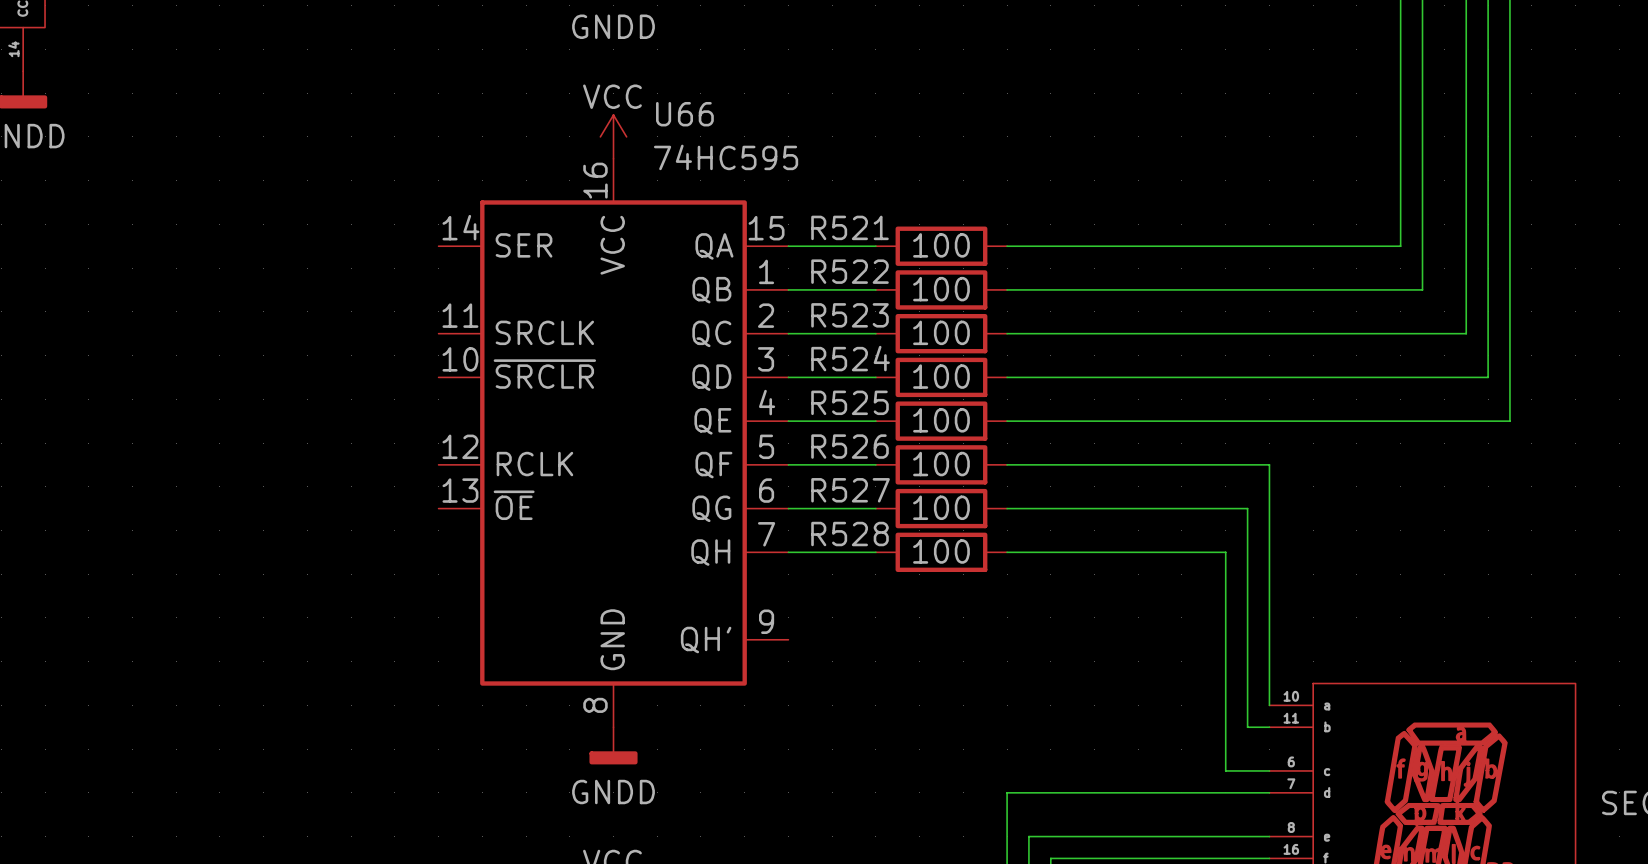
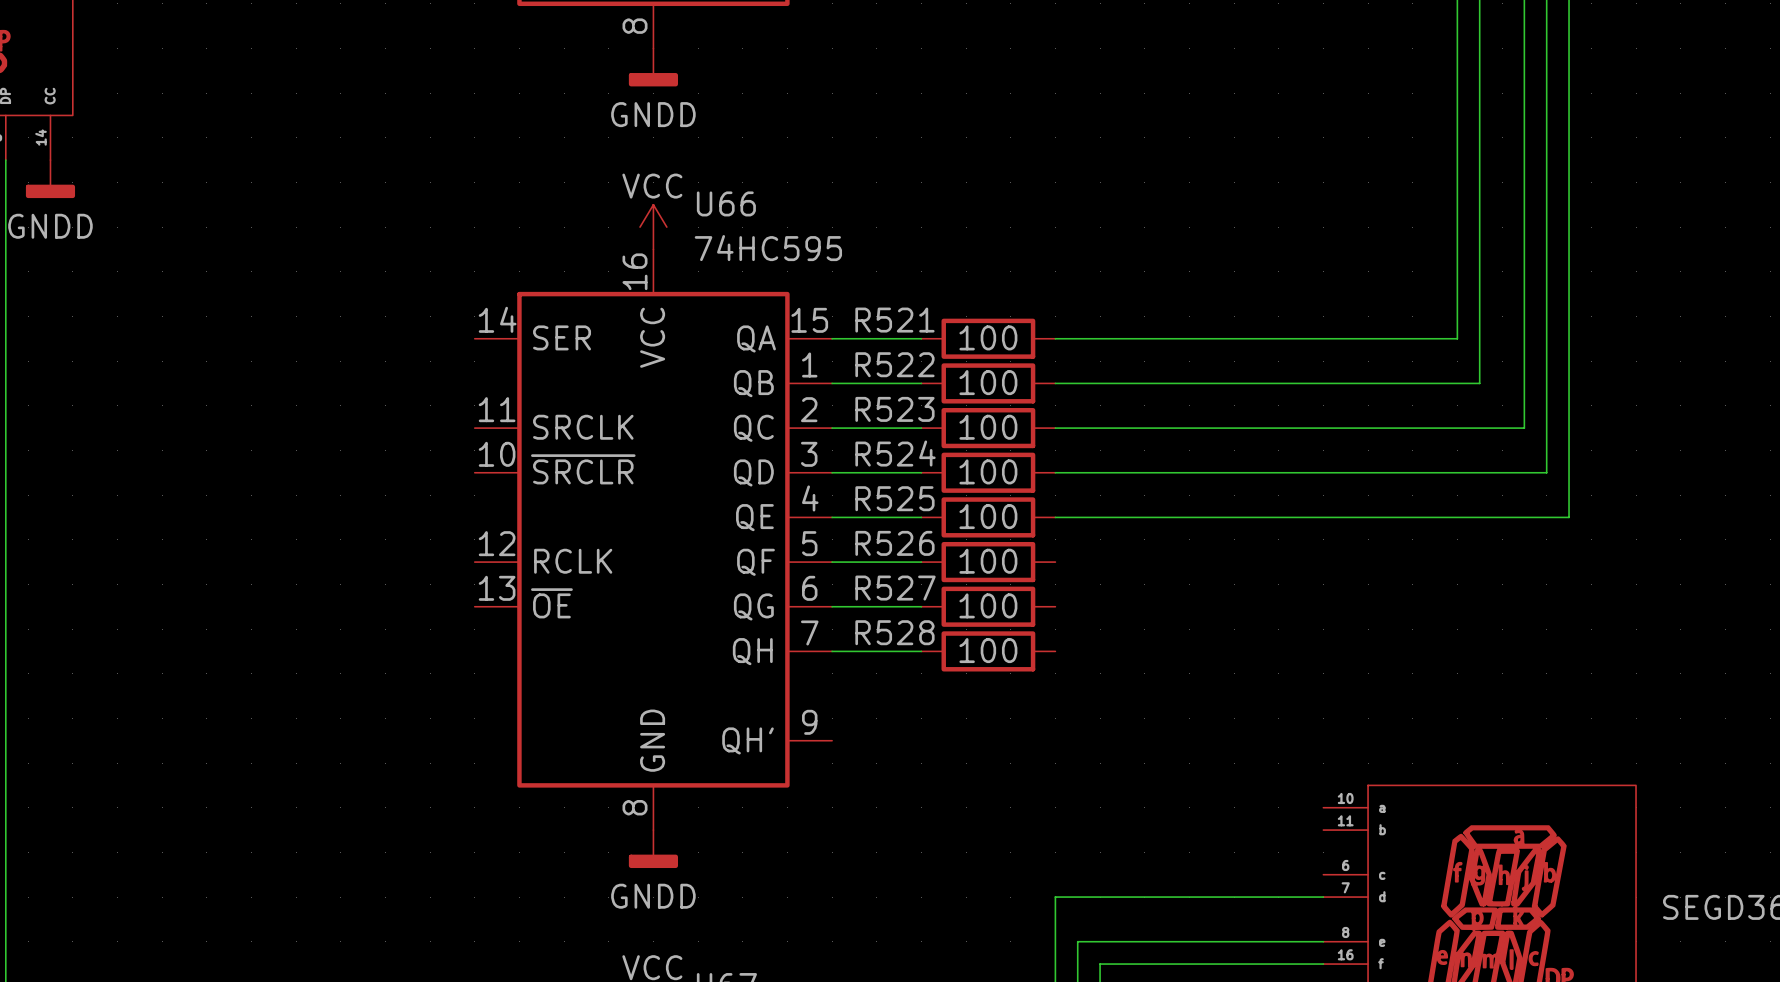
wire: (1007, 464) (1269, 464) (1269, 705) -> none
wire: (1007, 508) (1247, 508) (1247, 727) (1269, 727) -> none
wire: (1007, 552) (1225, 552) (1225, 770) (1269, 770) -> none

